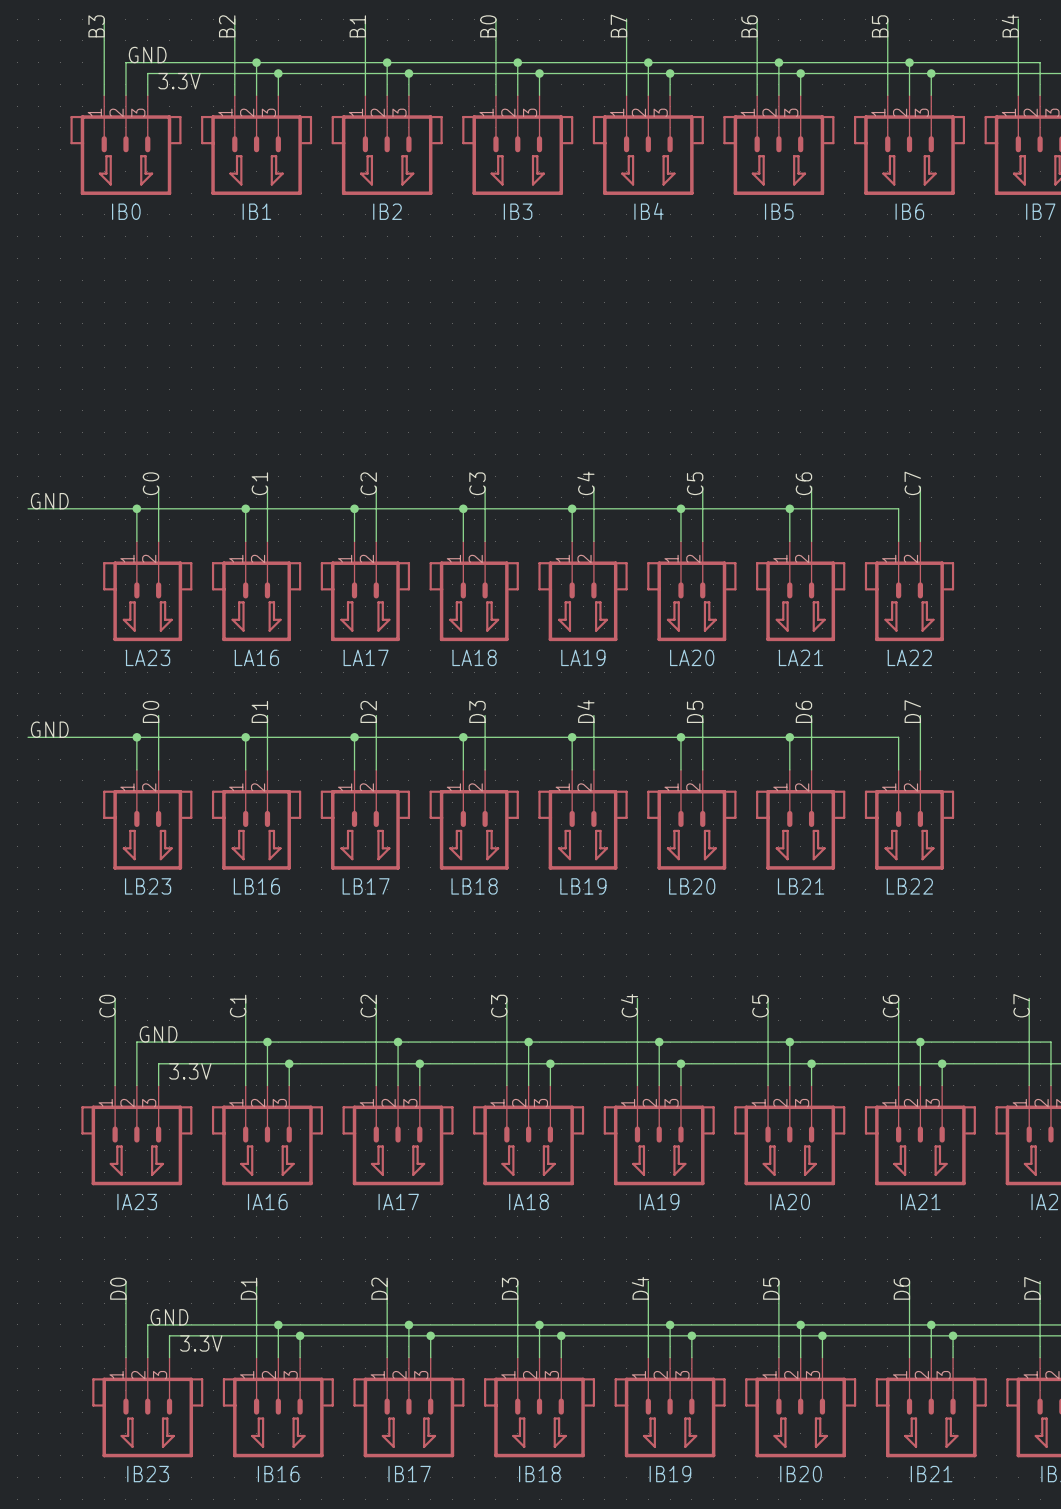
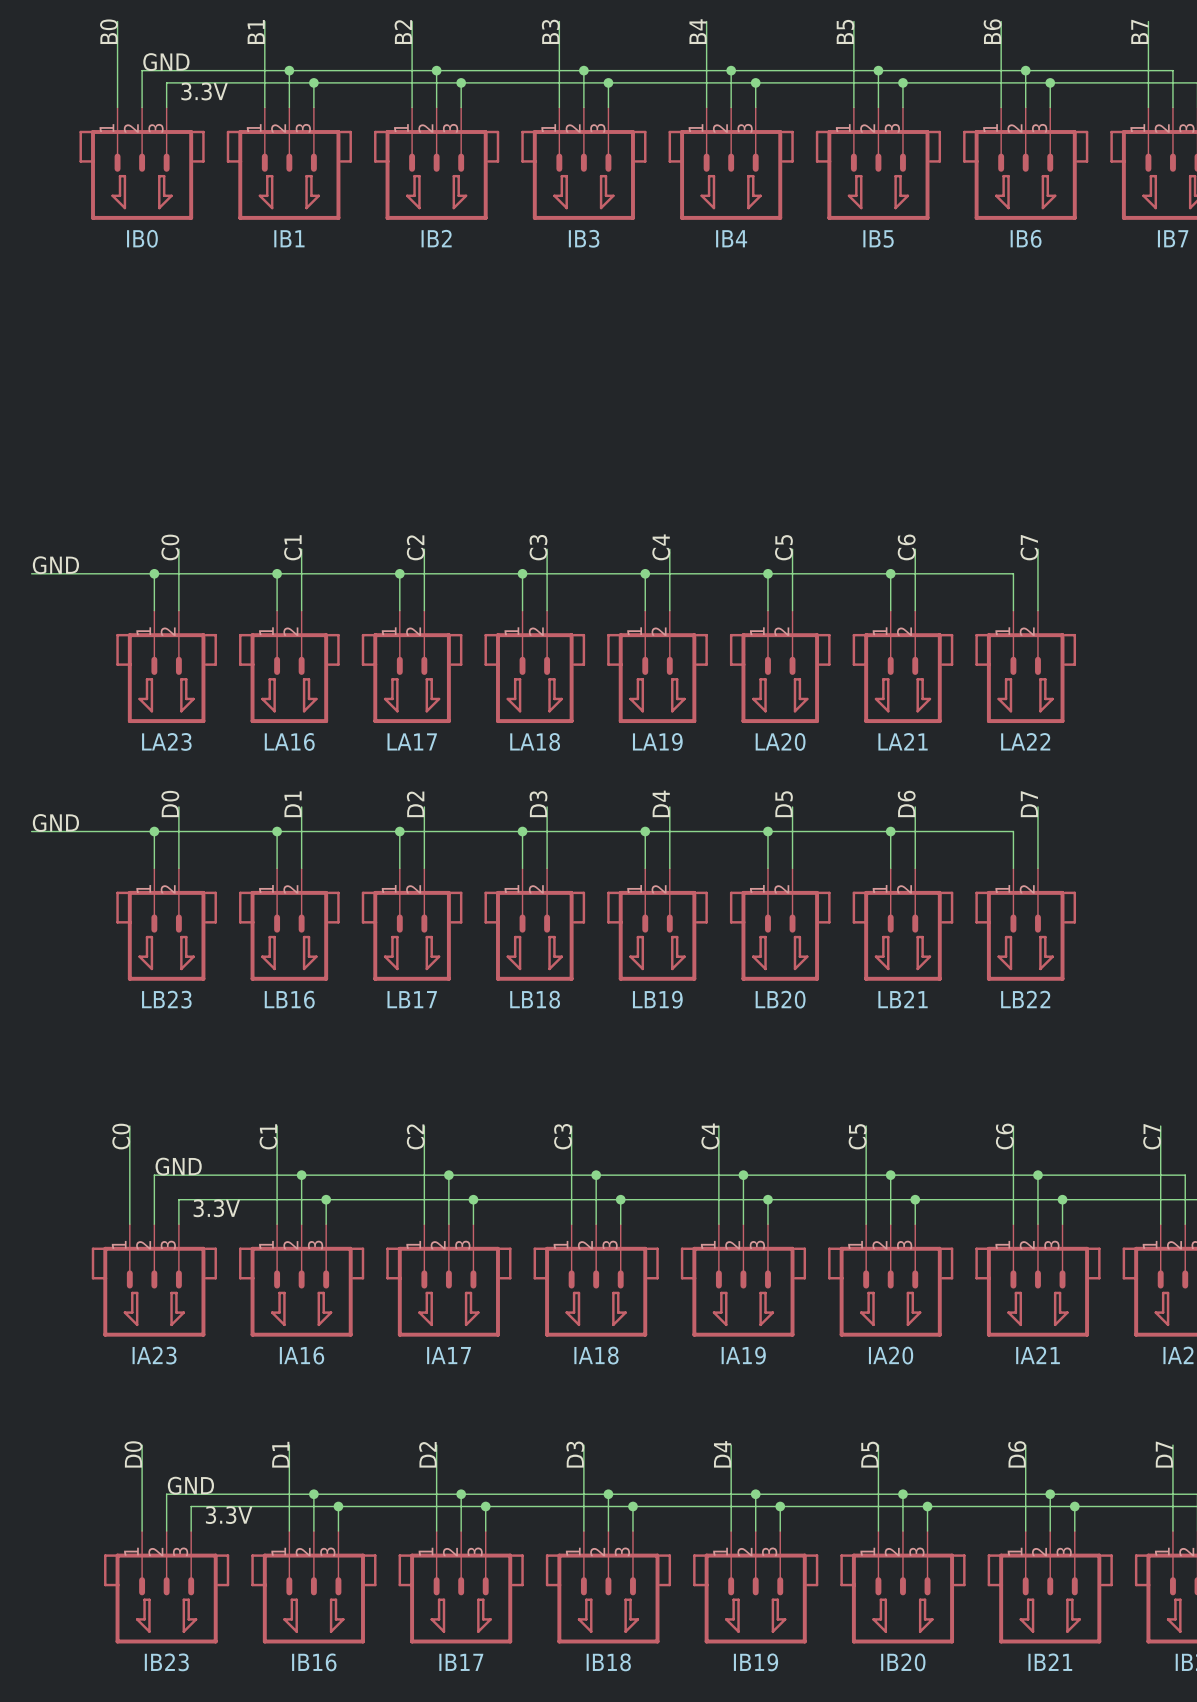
label: B3 (96, 26) -> B0 (108, 31)
label: B2 (227, 26) -> B1 (256, 32)
label: B1 (357, 26) -> B2 (403, 32)
label: B0 (488, 26) -> B3 (550, 31)
label: B7 (618, 26) -> B4 (698, 31)
label: B6 (749, 26) -> B5 (845, 31)
label: B5 (880, 26) -> B6 (992, 31)
label: B4 (1010, 26) -> B7 (1139, 31)

